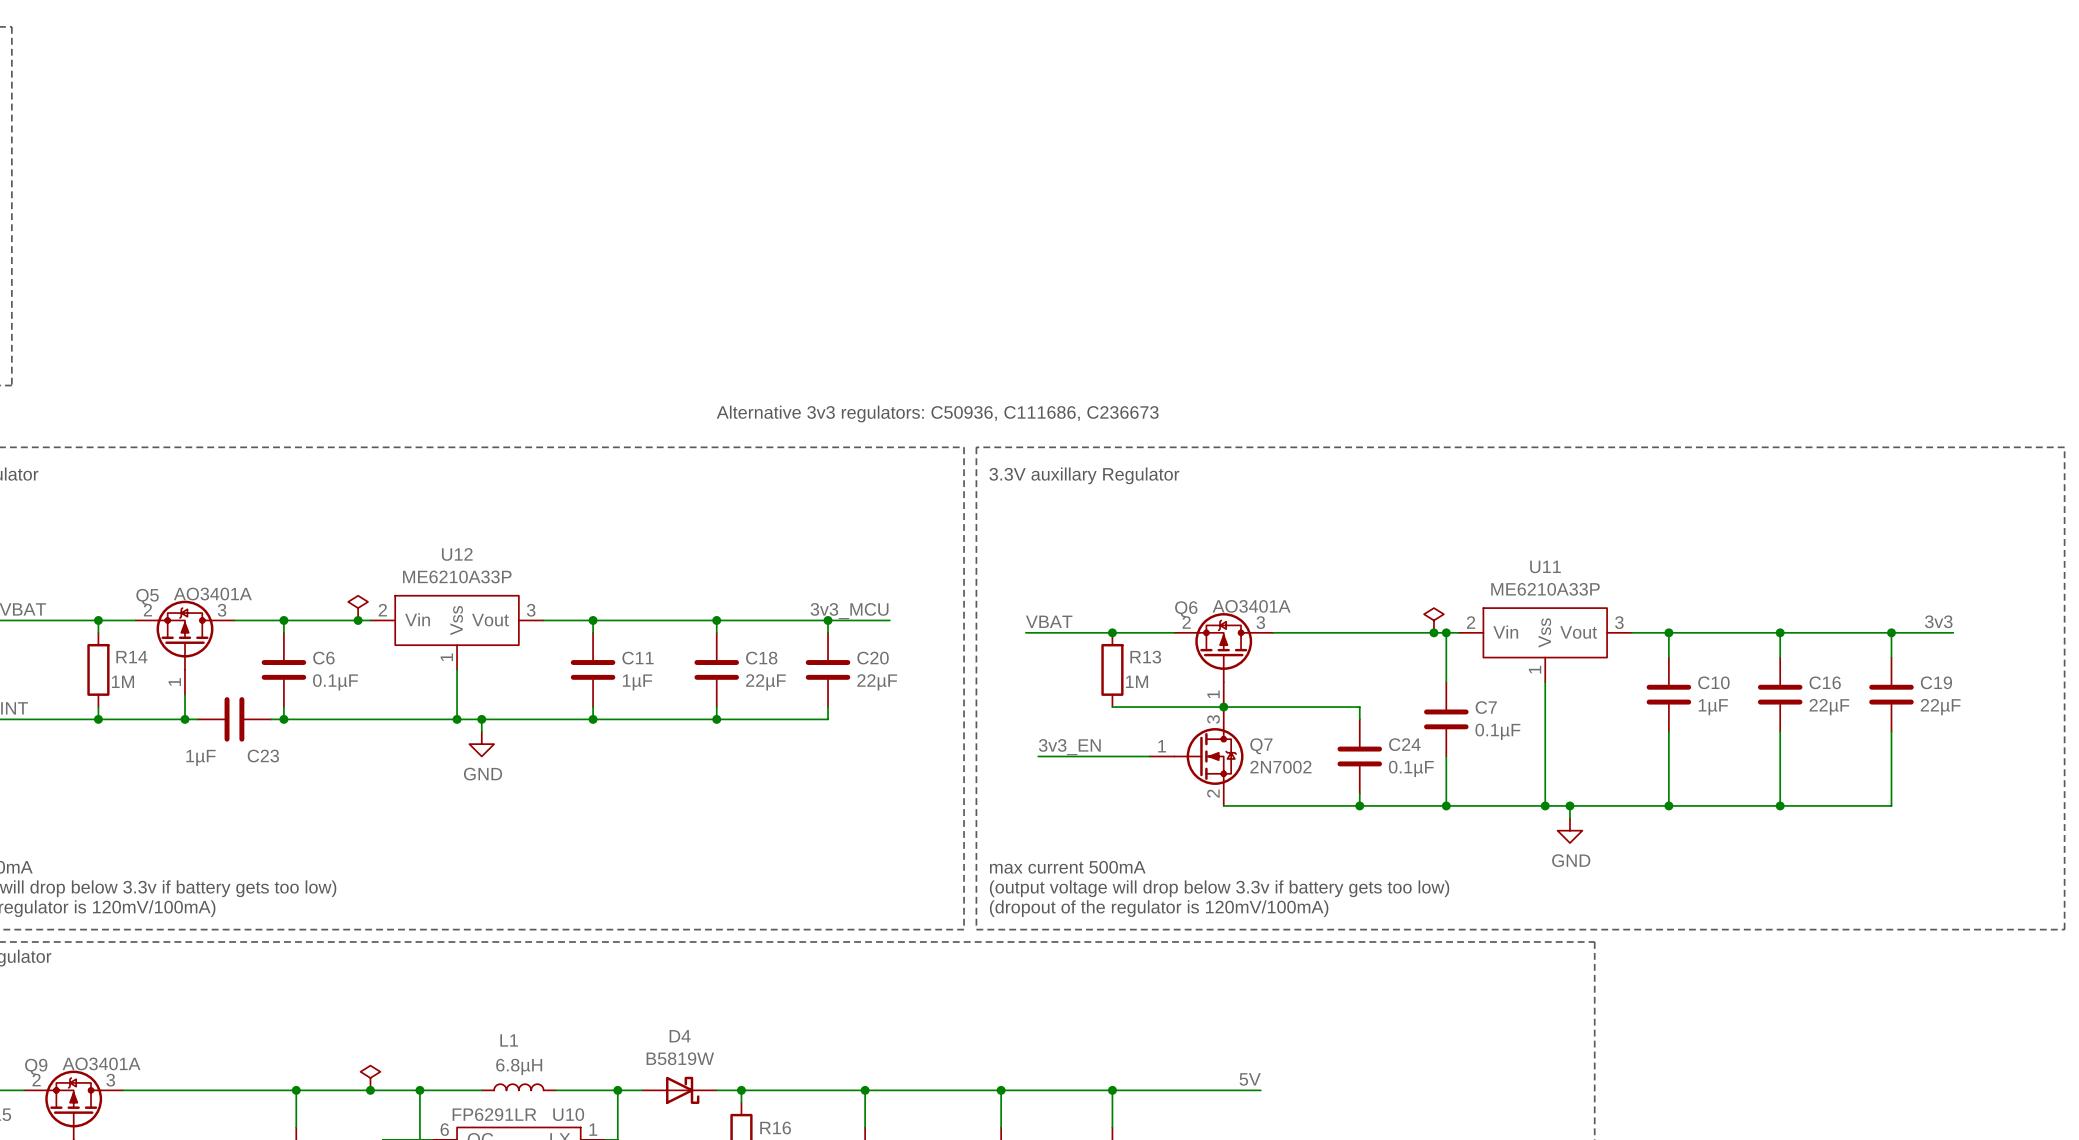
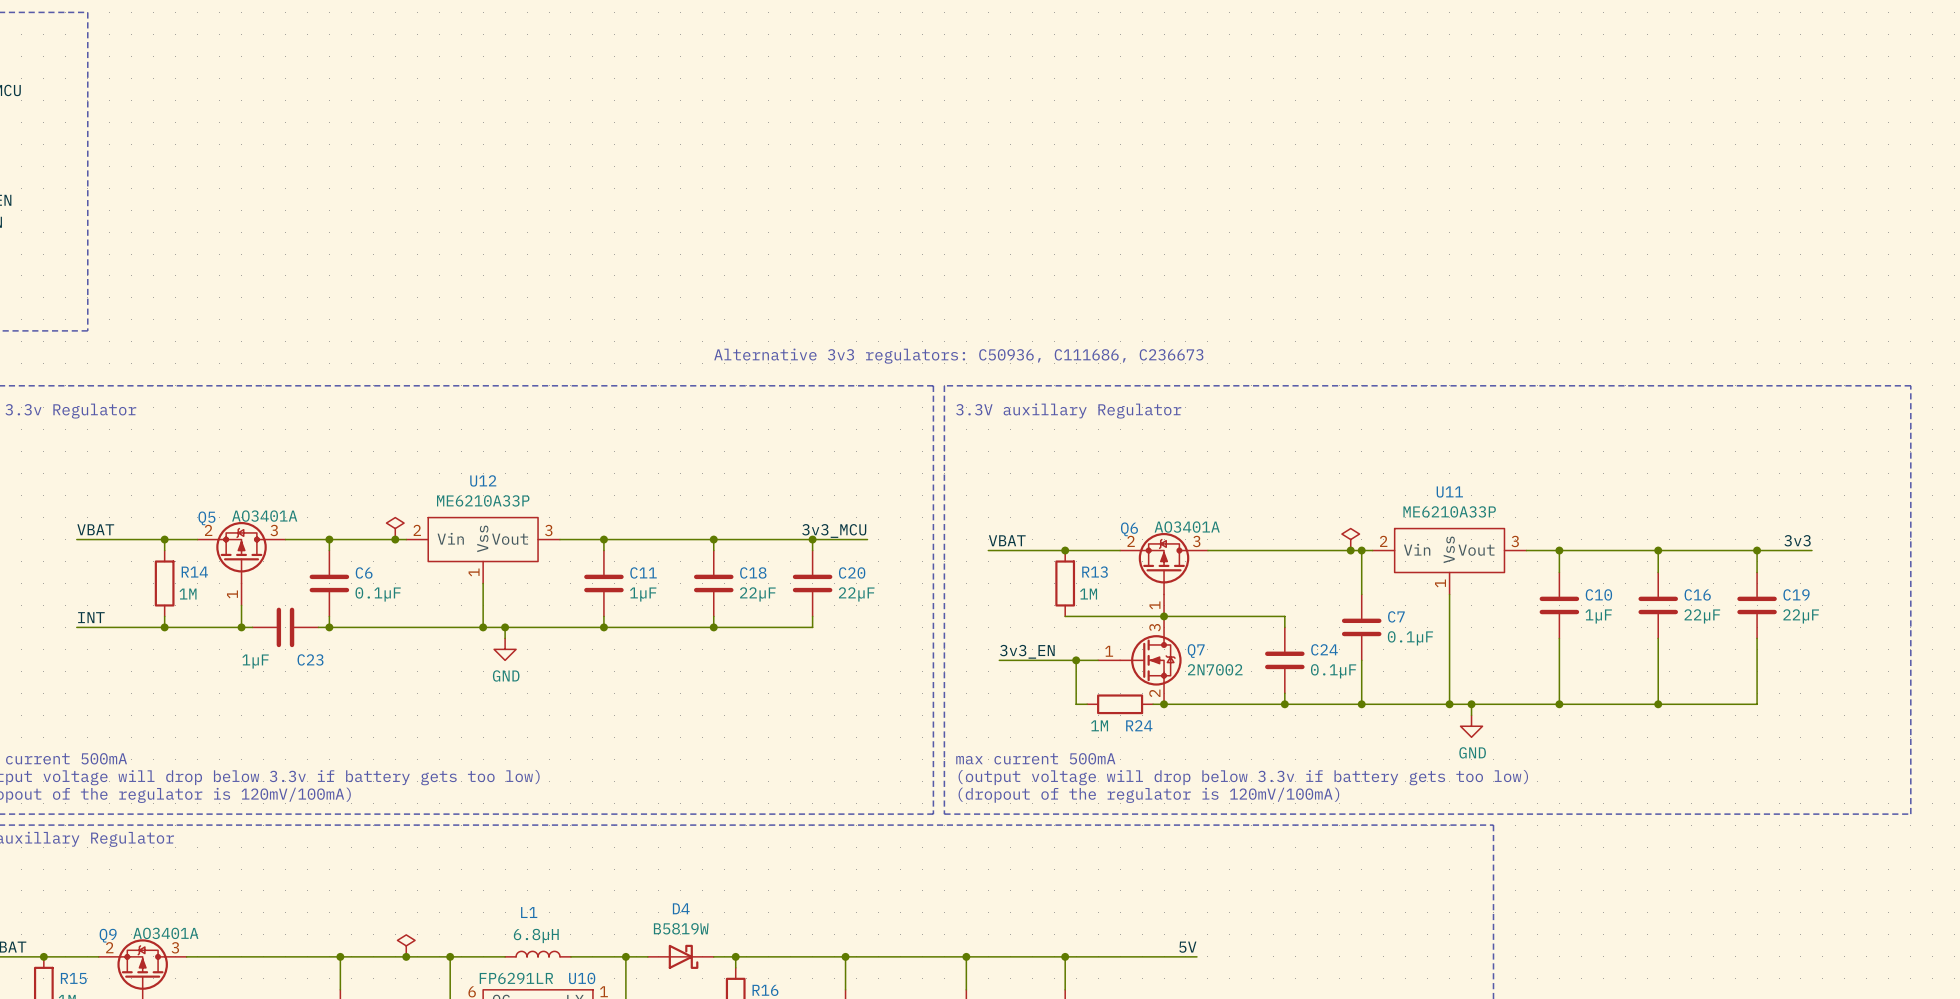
wire: none -> (1076, 660) (1076, 704) (1087, 704)
junction: none -> (1076, 660)
R24: none -> 1M (1120, 704)
wire: none -> (1153, 704) (1164, 704)
junction: none -> (1164, 704)

